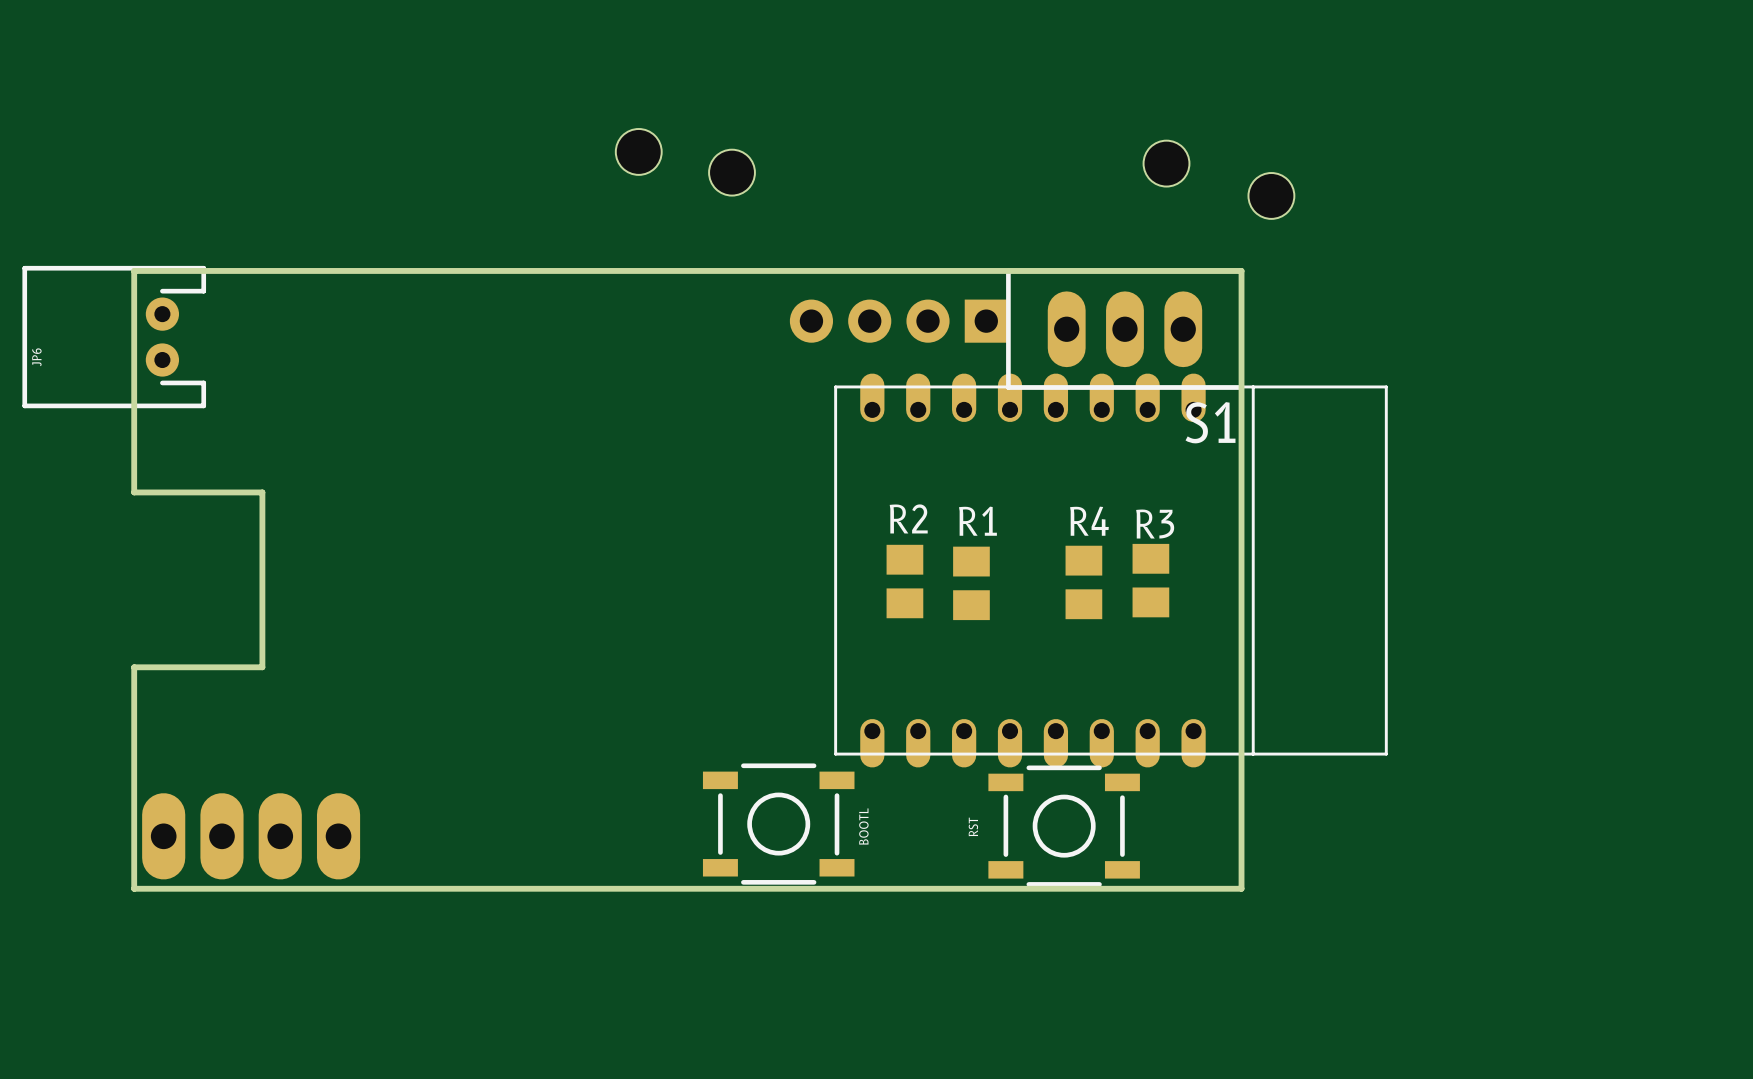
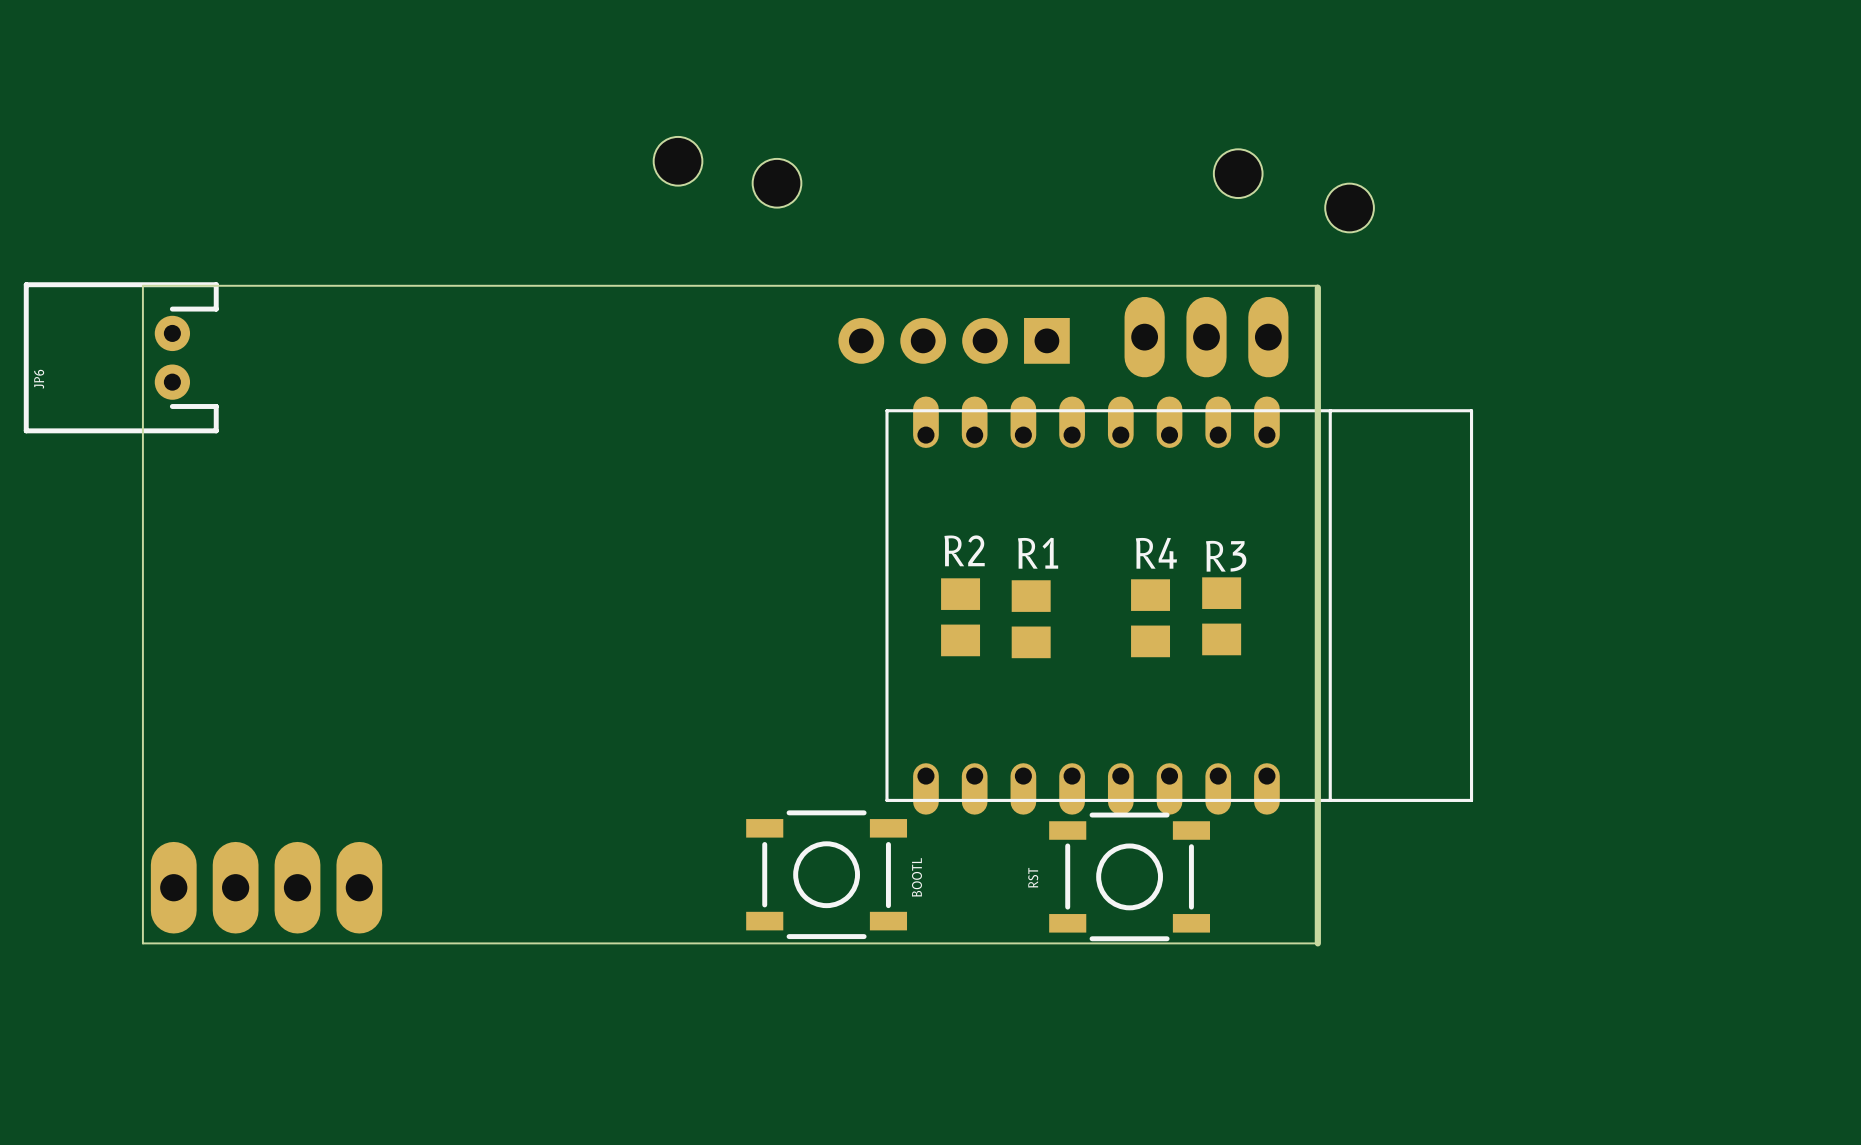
board edge: none -> (142, 285) (142, 943)
board edge: (1241, 270) (134, 270) (134, 492) (262, 492) (262, 667) (134, 667) (134, 888) (1241, 888) -> none
S1 side: bottom (1124, 329) -> top (1206, 337)

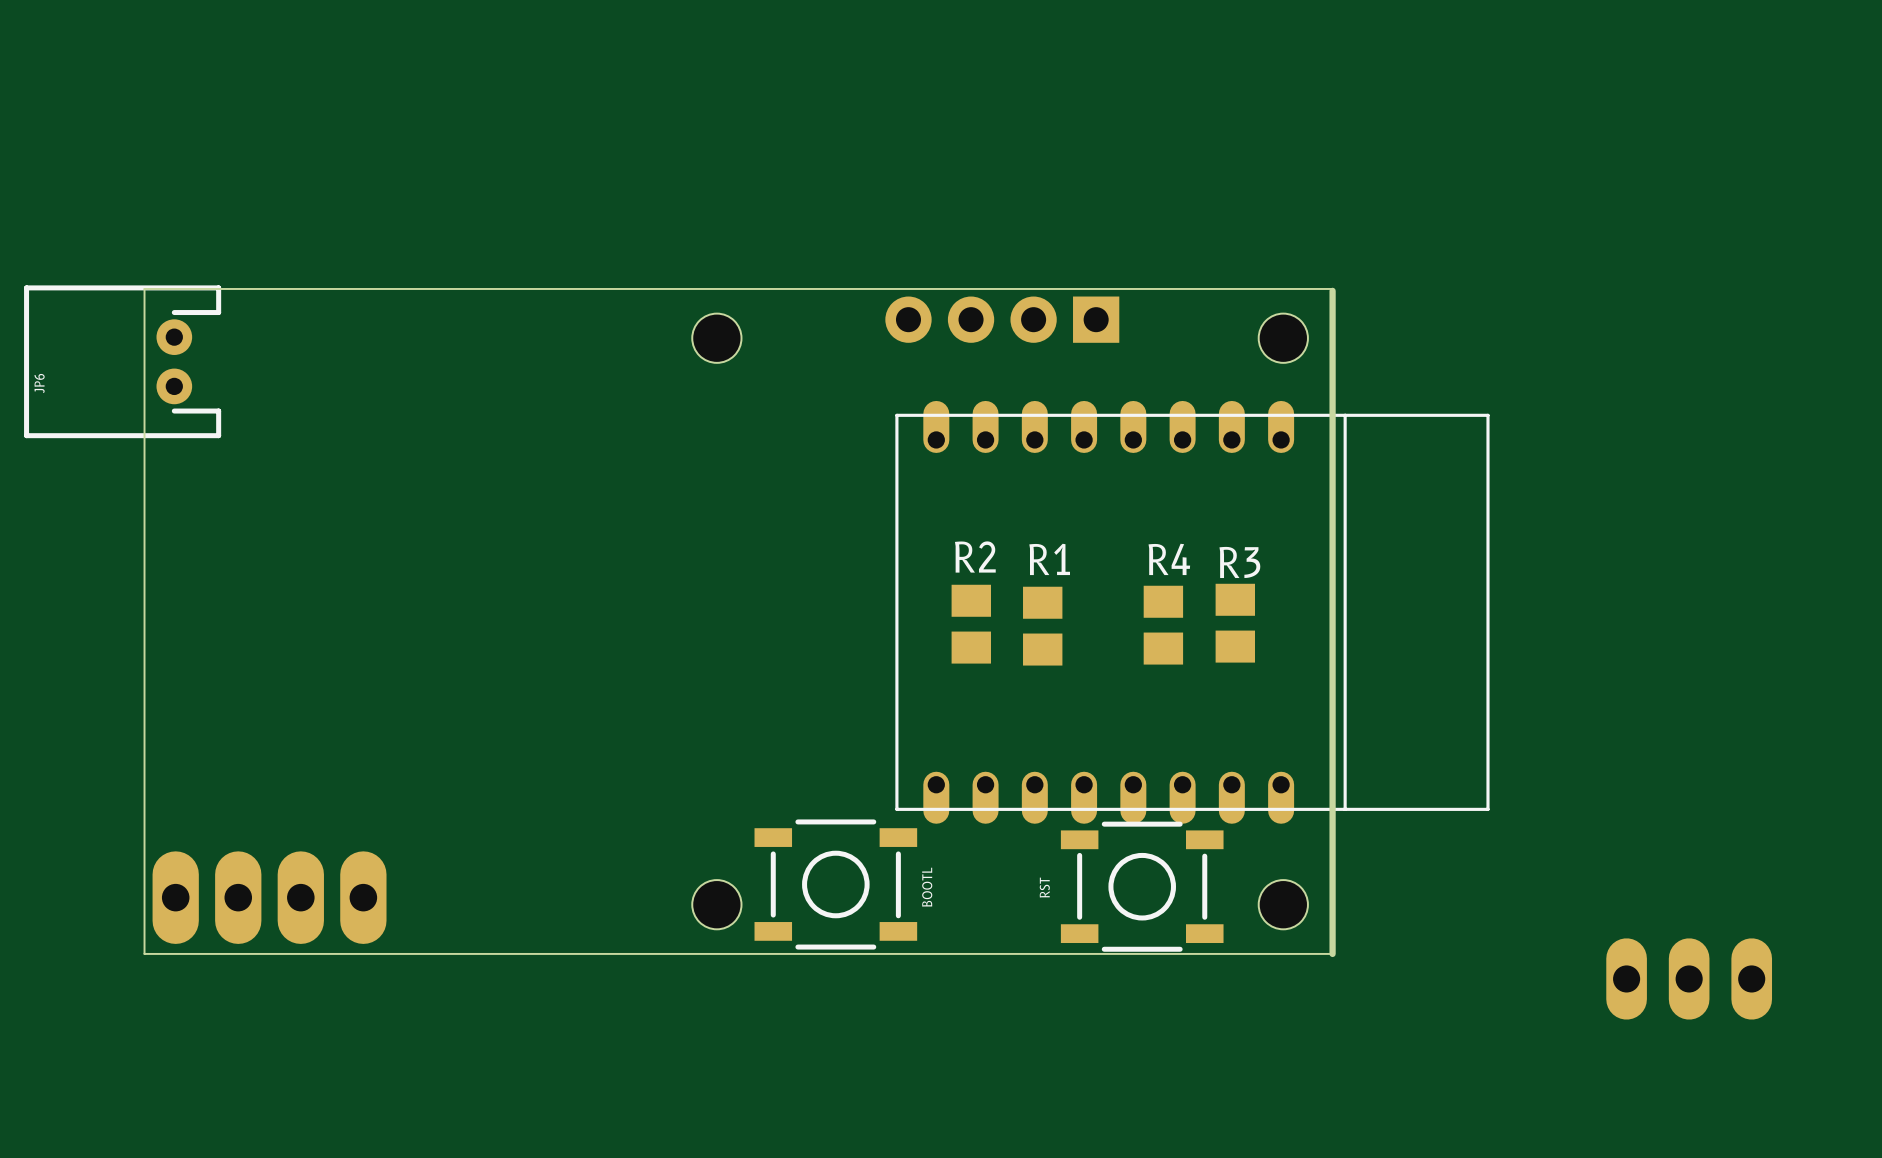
hole: (678, 161) -> none
hole: (1238, 173) -> none
hole: (777, 183) -> none
hole: (1349, 207) -> none
hole: none -> (716, 338)
hole: none -> (1283, 338)
part: (1206, 337) -> none
part position: (954, 340) -> (1002, 319)
hole: none -> (716, 904)
hole: none -> (1283, 904)
part: none -> (1689, 978)

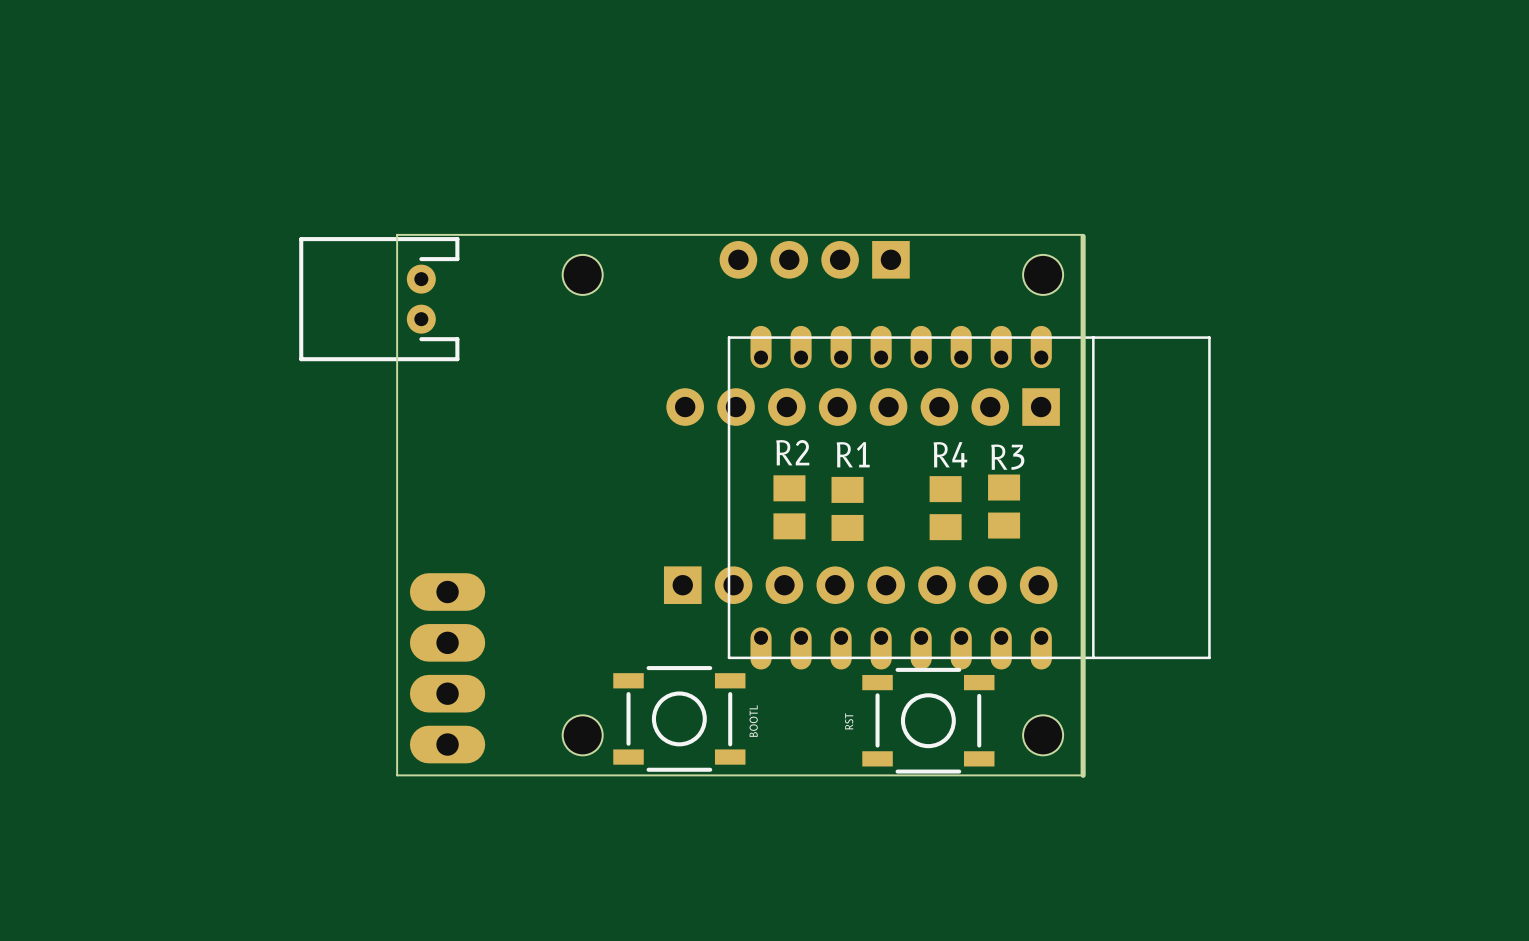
board edge: (488, 288) (144, 288) (144, 953) (488, 953) -> (397, 234) (397, 775)
JP6: (122, 361) -> none
part: none -> (379, 299)
part: none -> (863, 407)
part: none -> (860, 585)
part rotation: 0° (269, 897) -> 90° clockwise (447, 668)
part position: (269, 897) -> (447, 668)
part: (1689, 978) -> none

